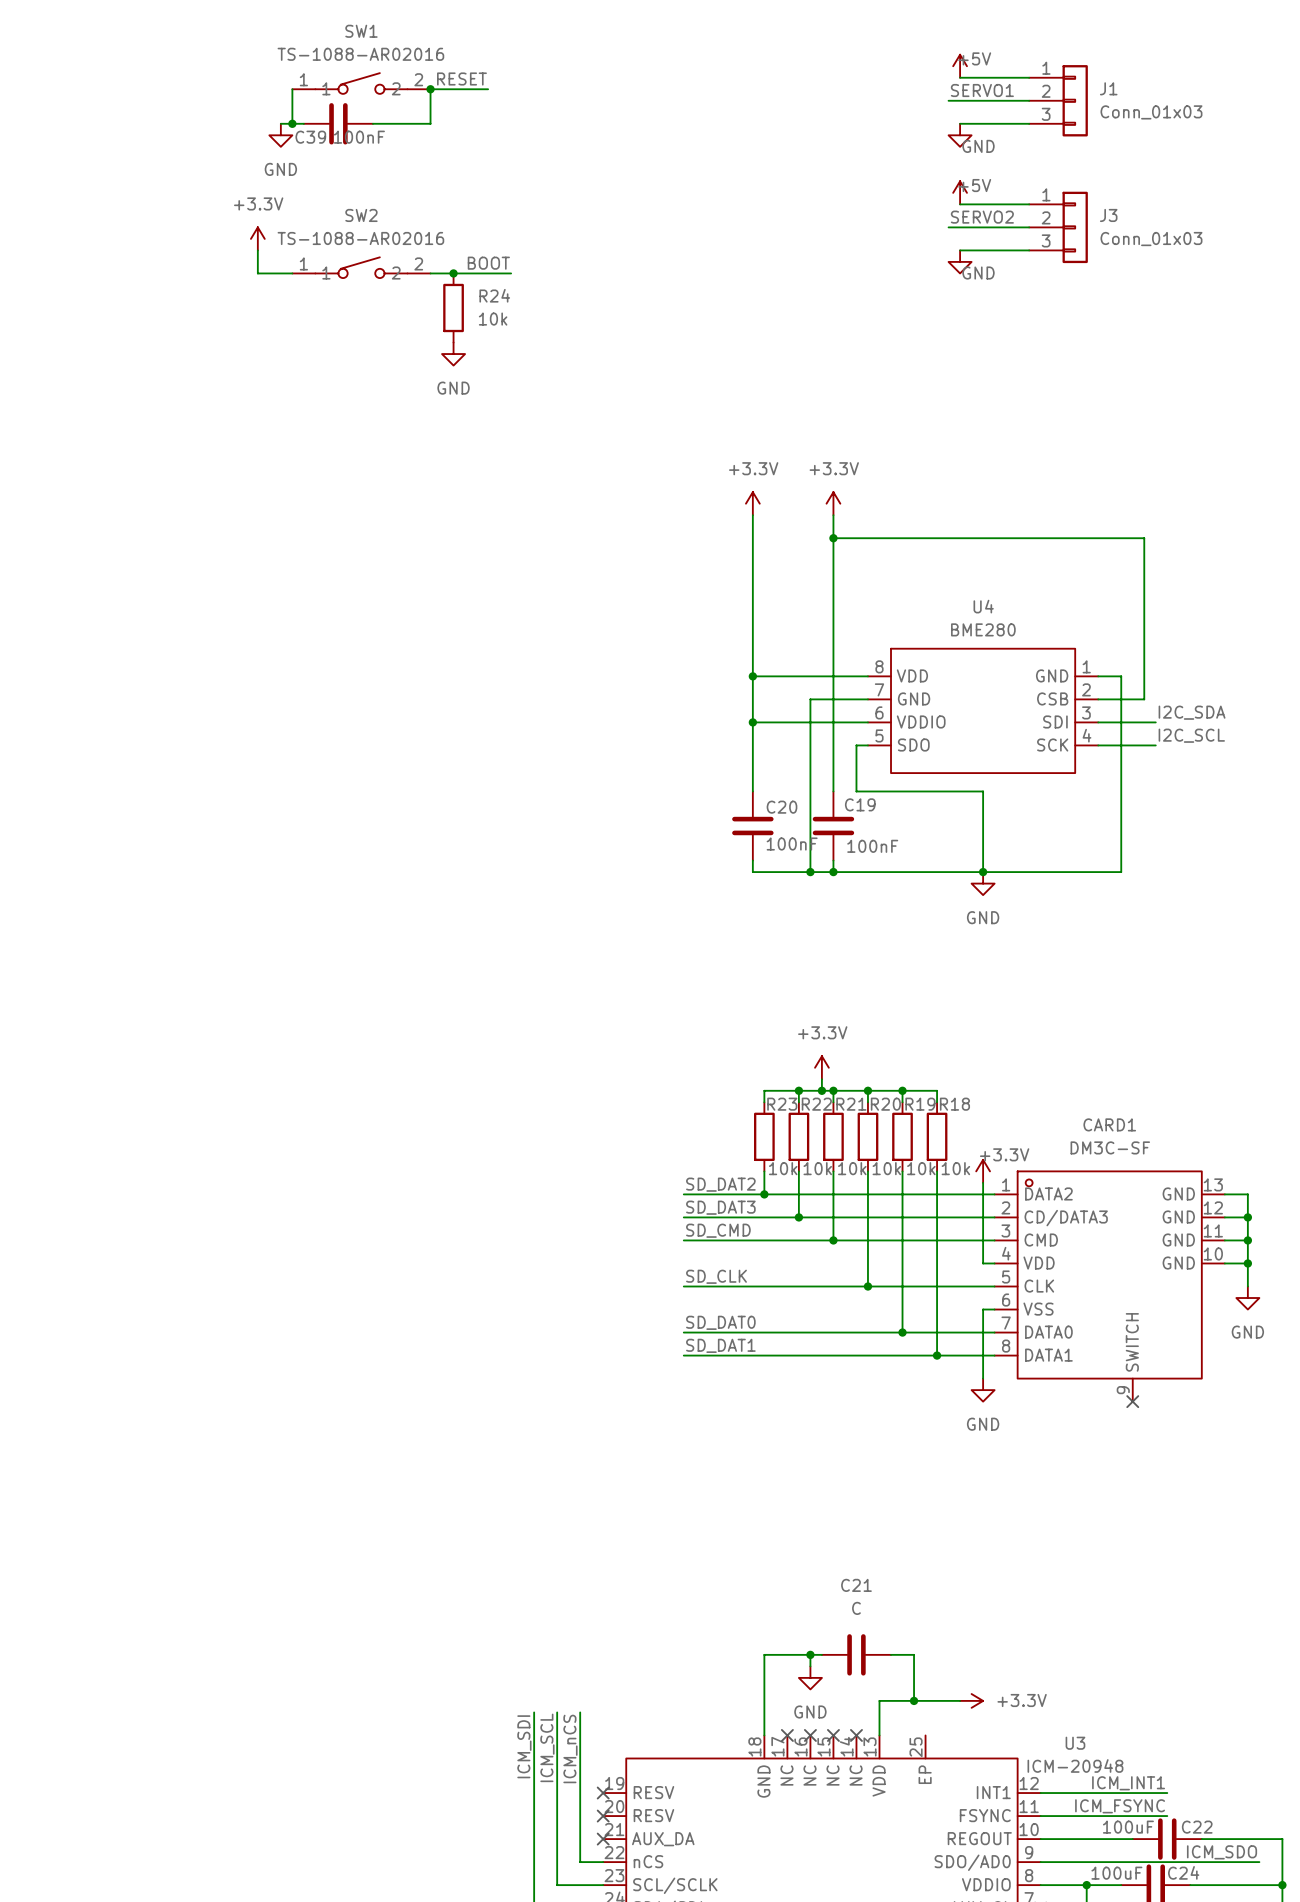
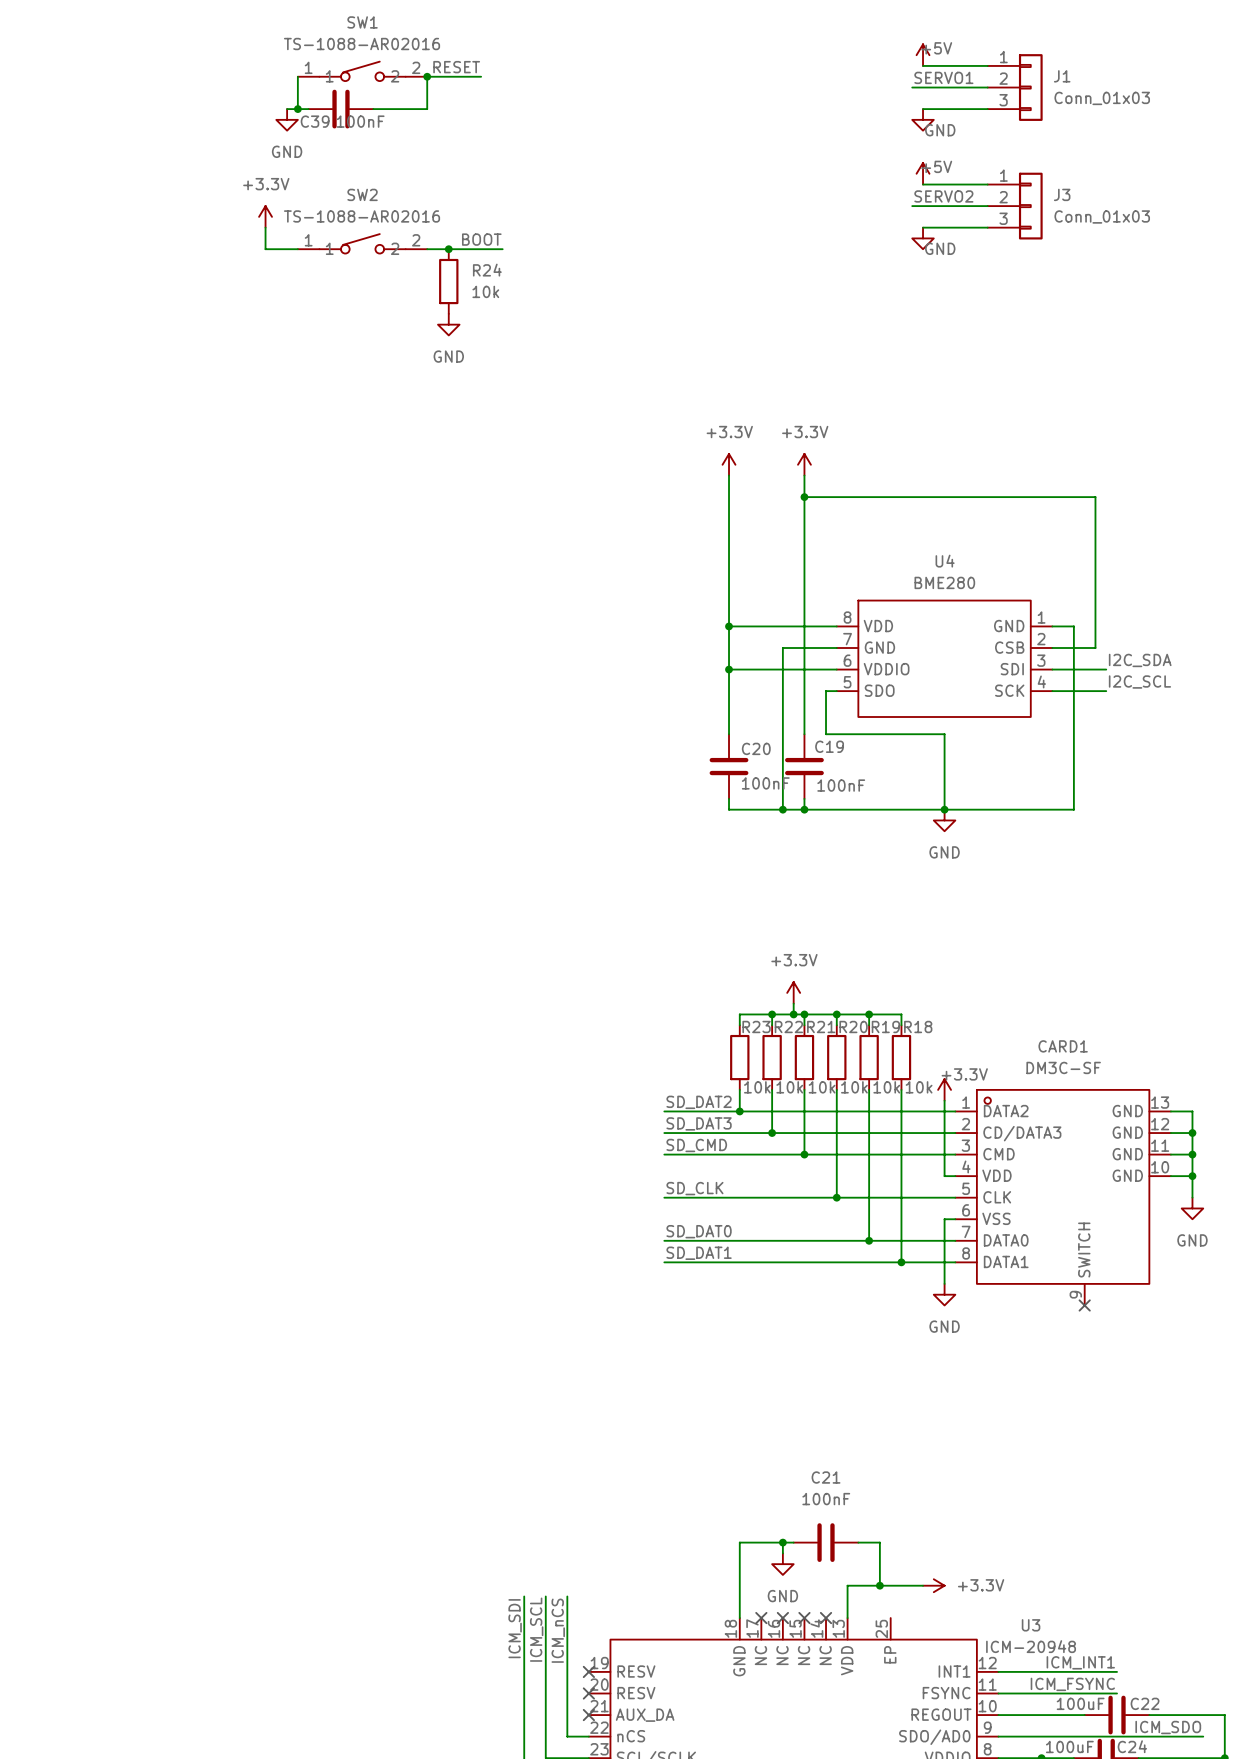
C21 value: C (856, 1608) -> 100nF (826, 1499)

